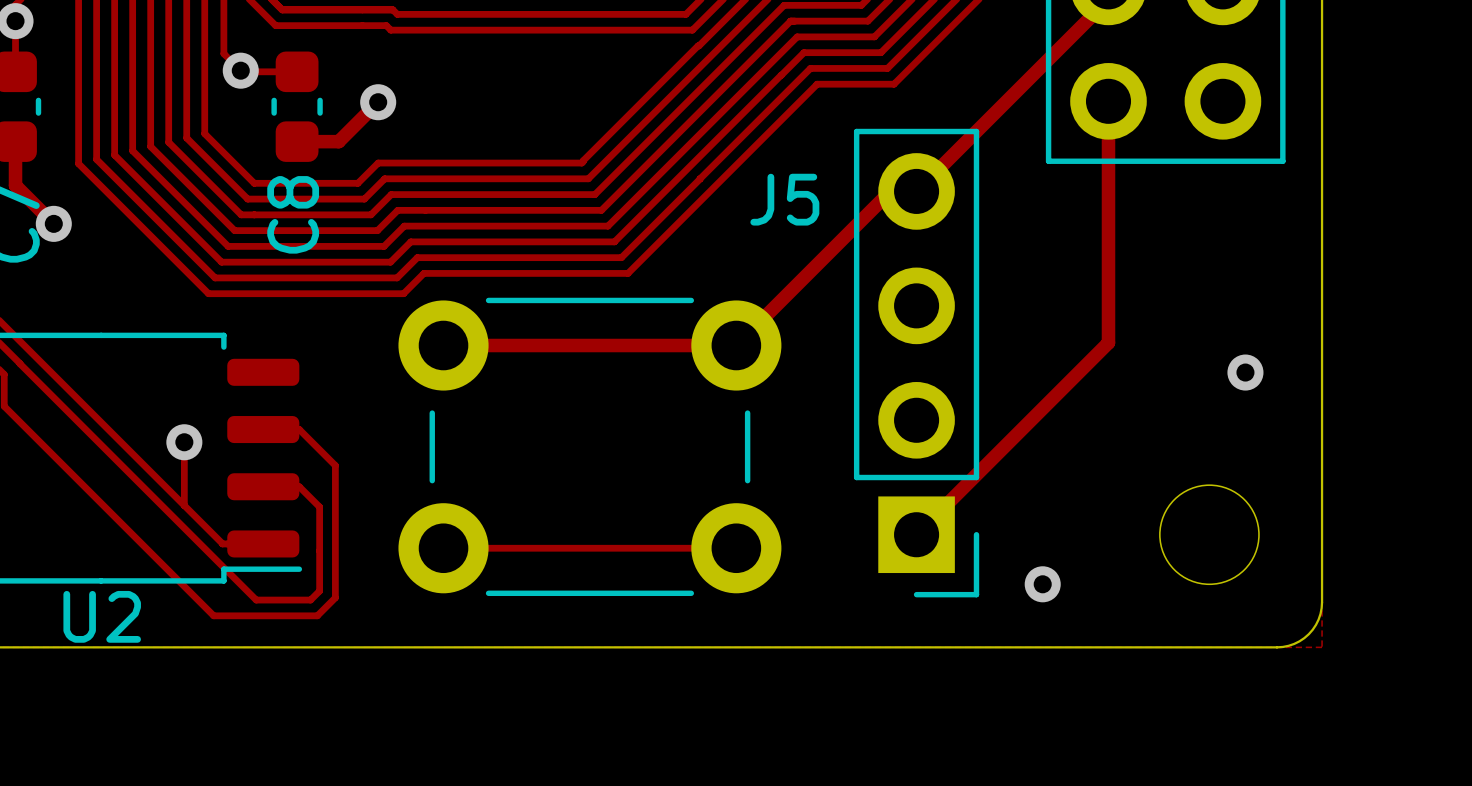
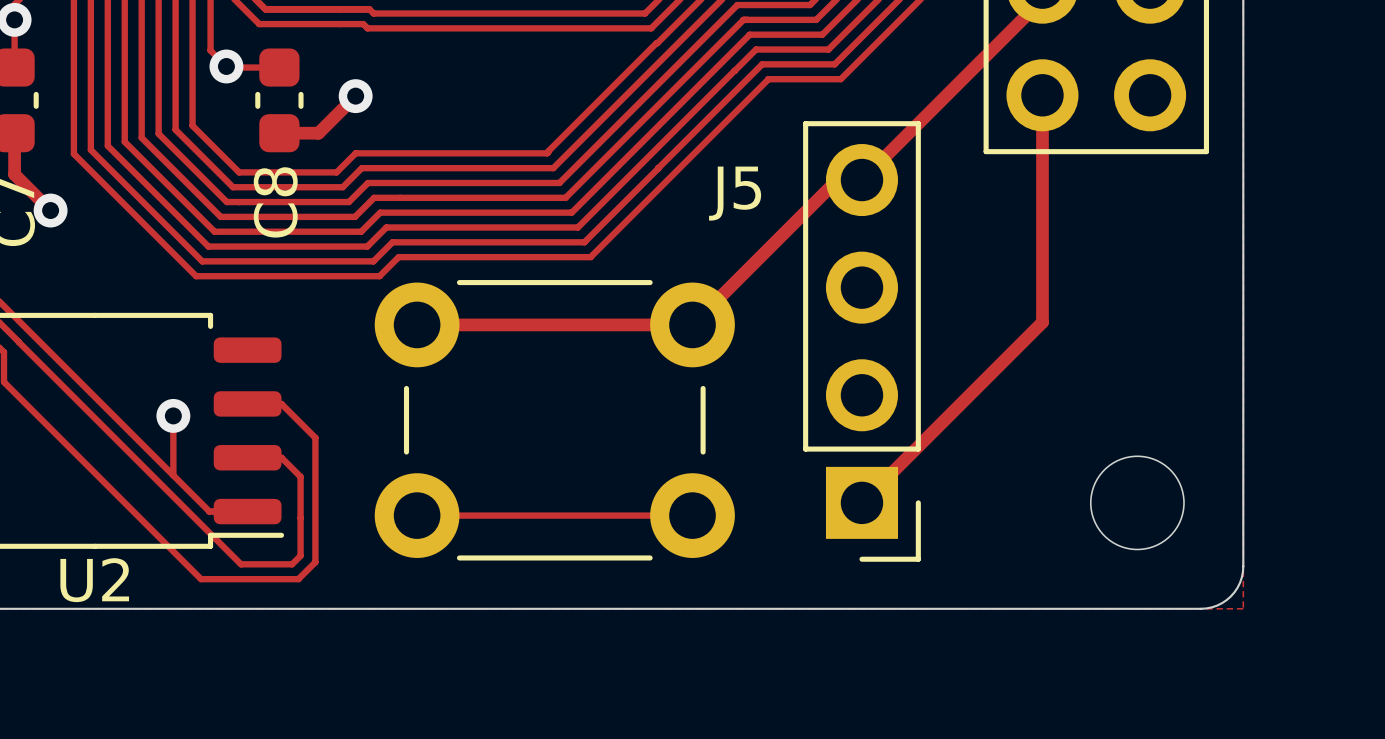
via: (1245, 372) -> none
via: (1042, 584) -> none

